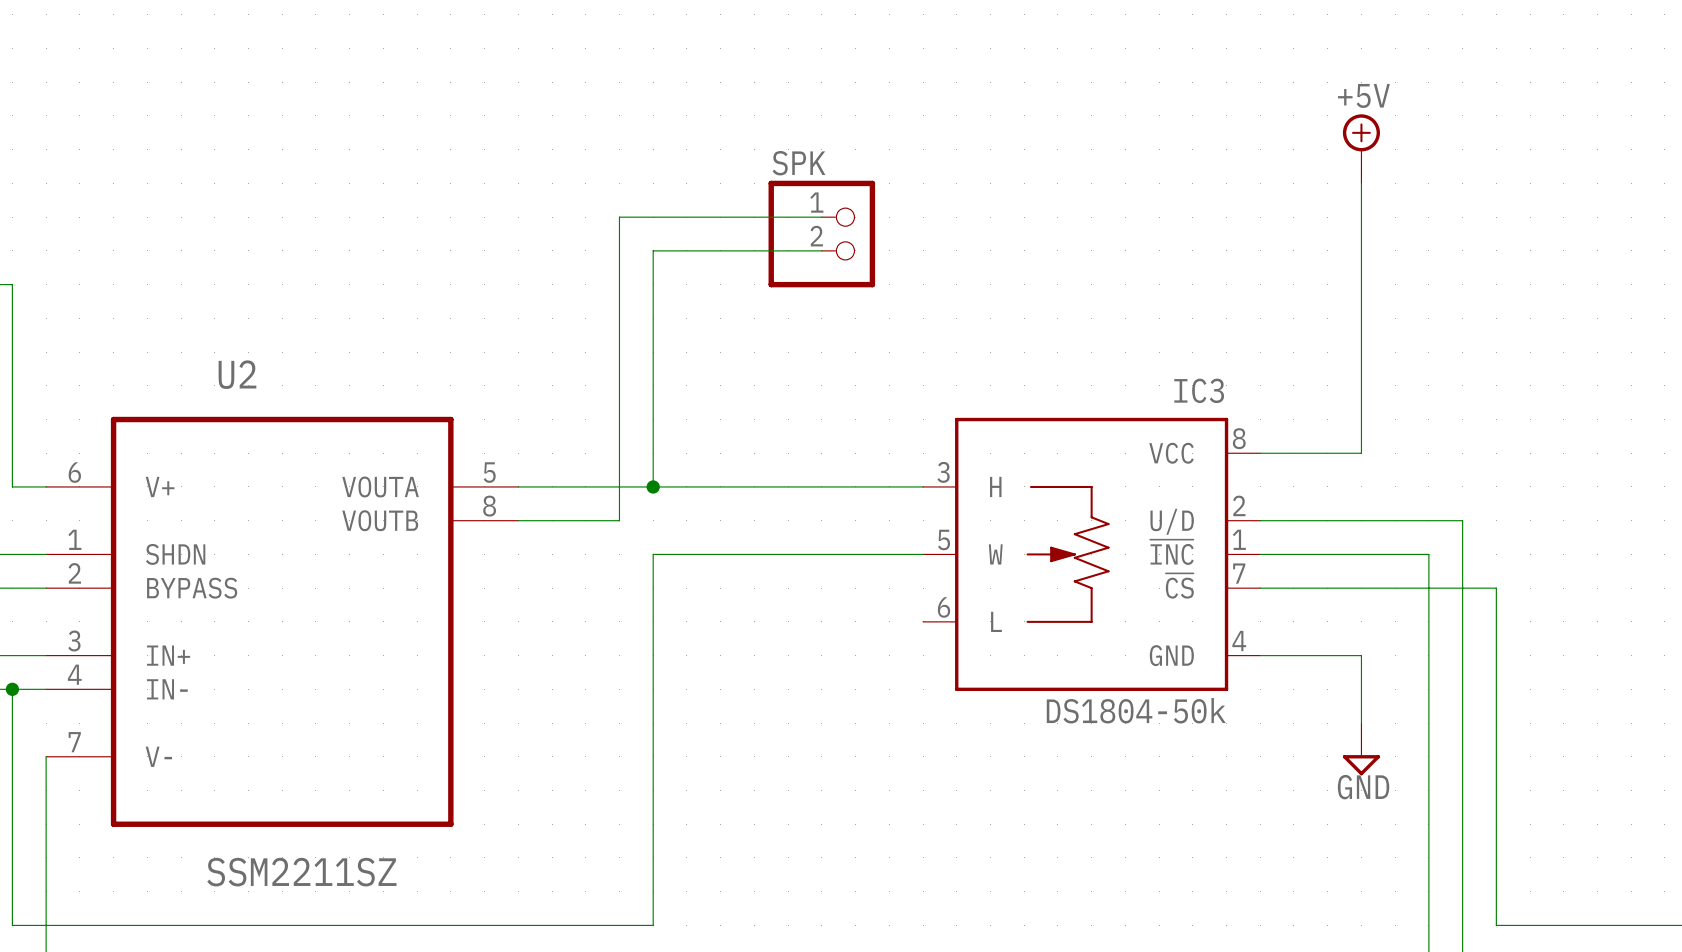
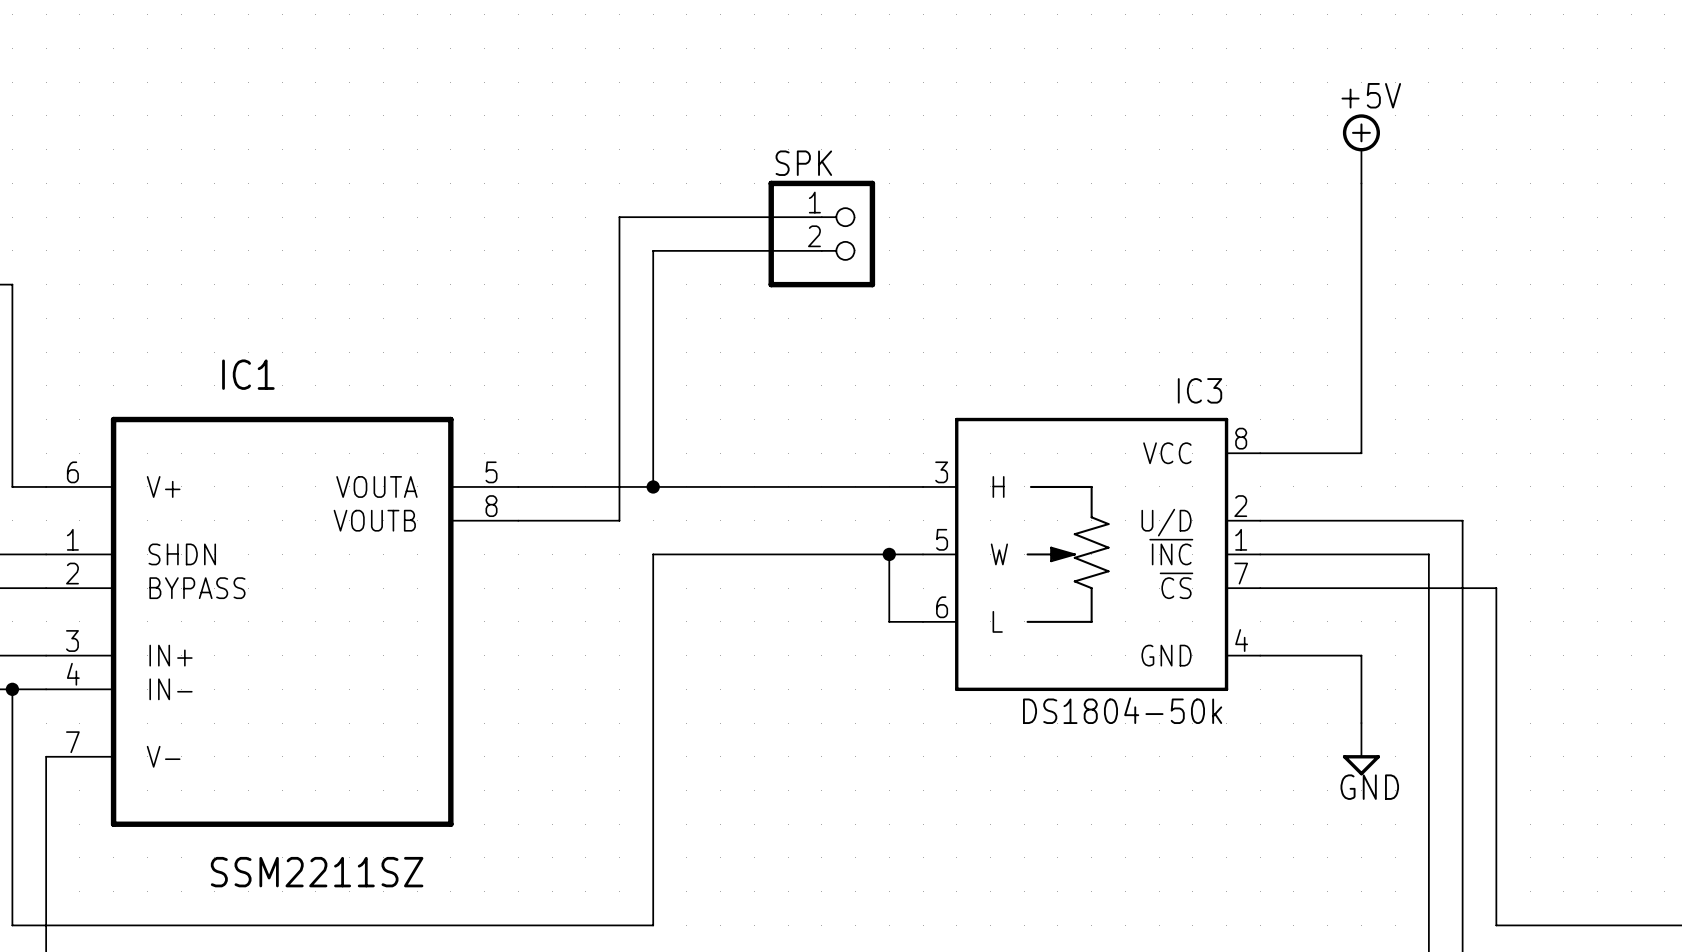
U2 name: U2 (237, 374) -> IC1 (248, 374)
wire: none -> (889, 554) (889, 621) (923, 621)
junction: none -> (889, 554)

